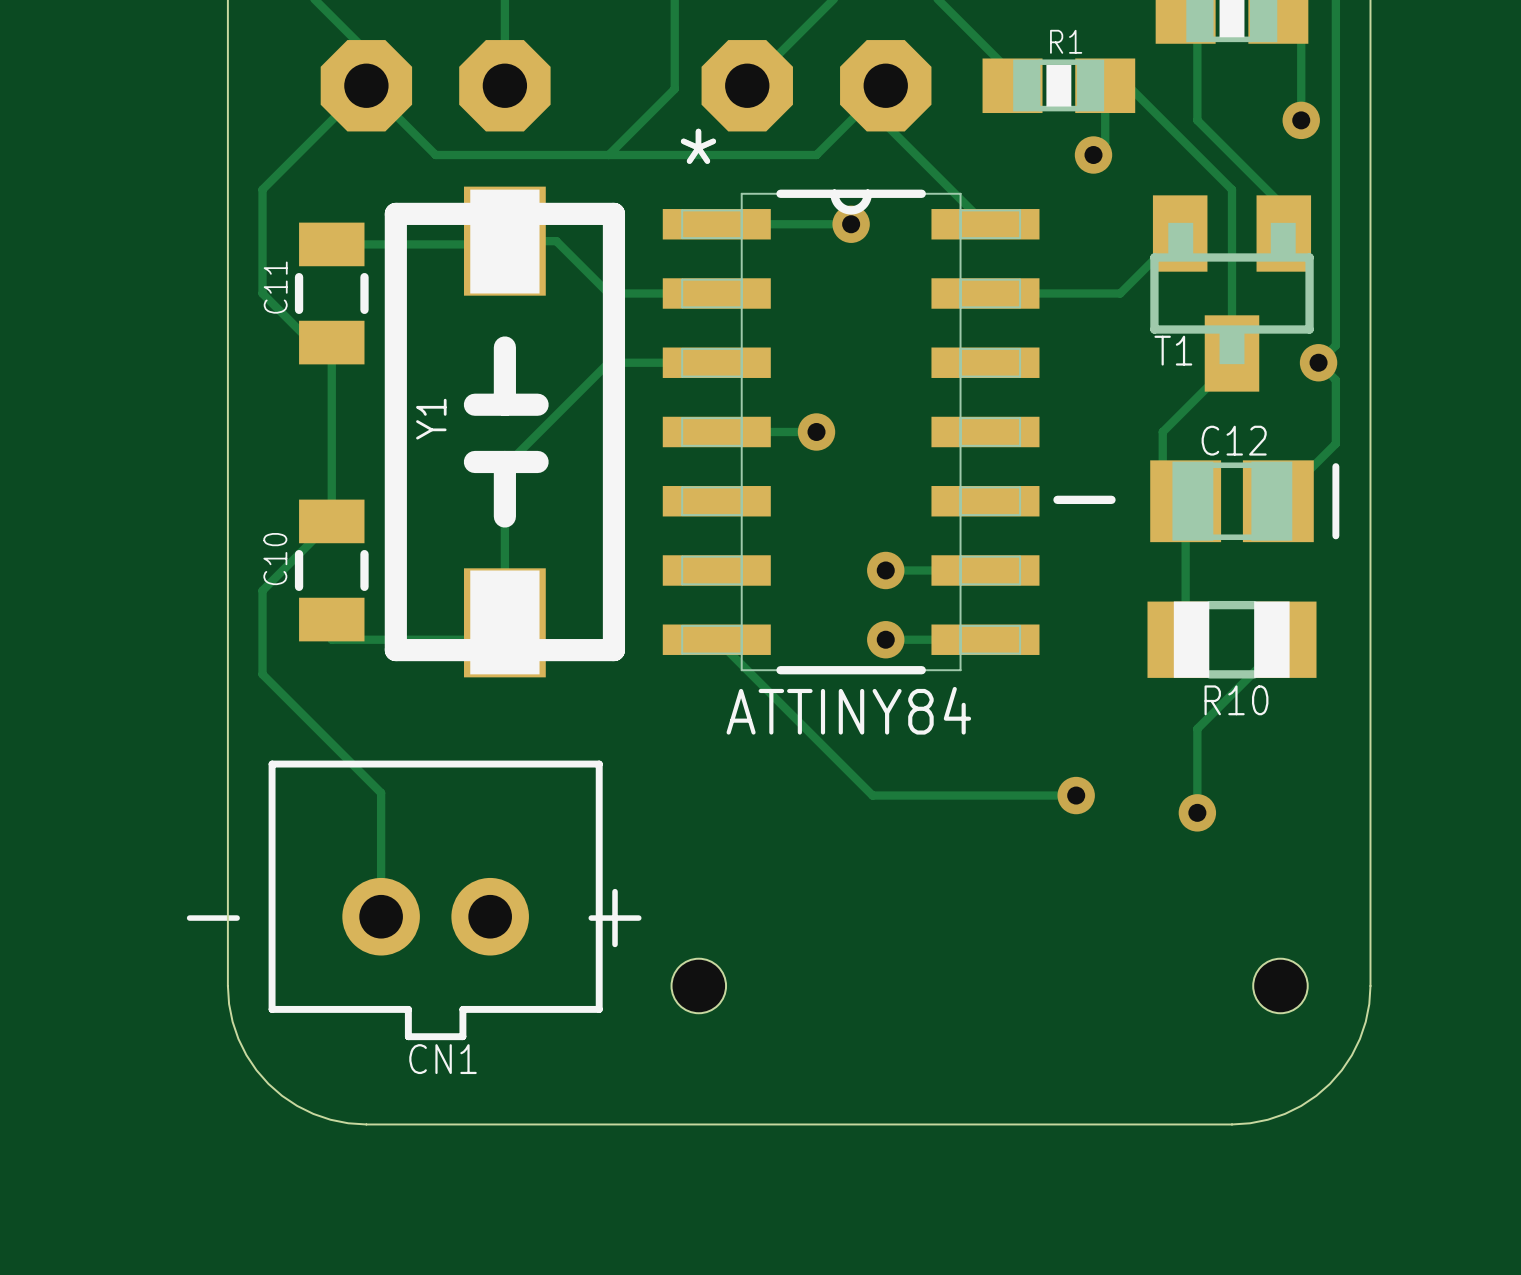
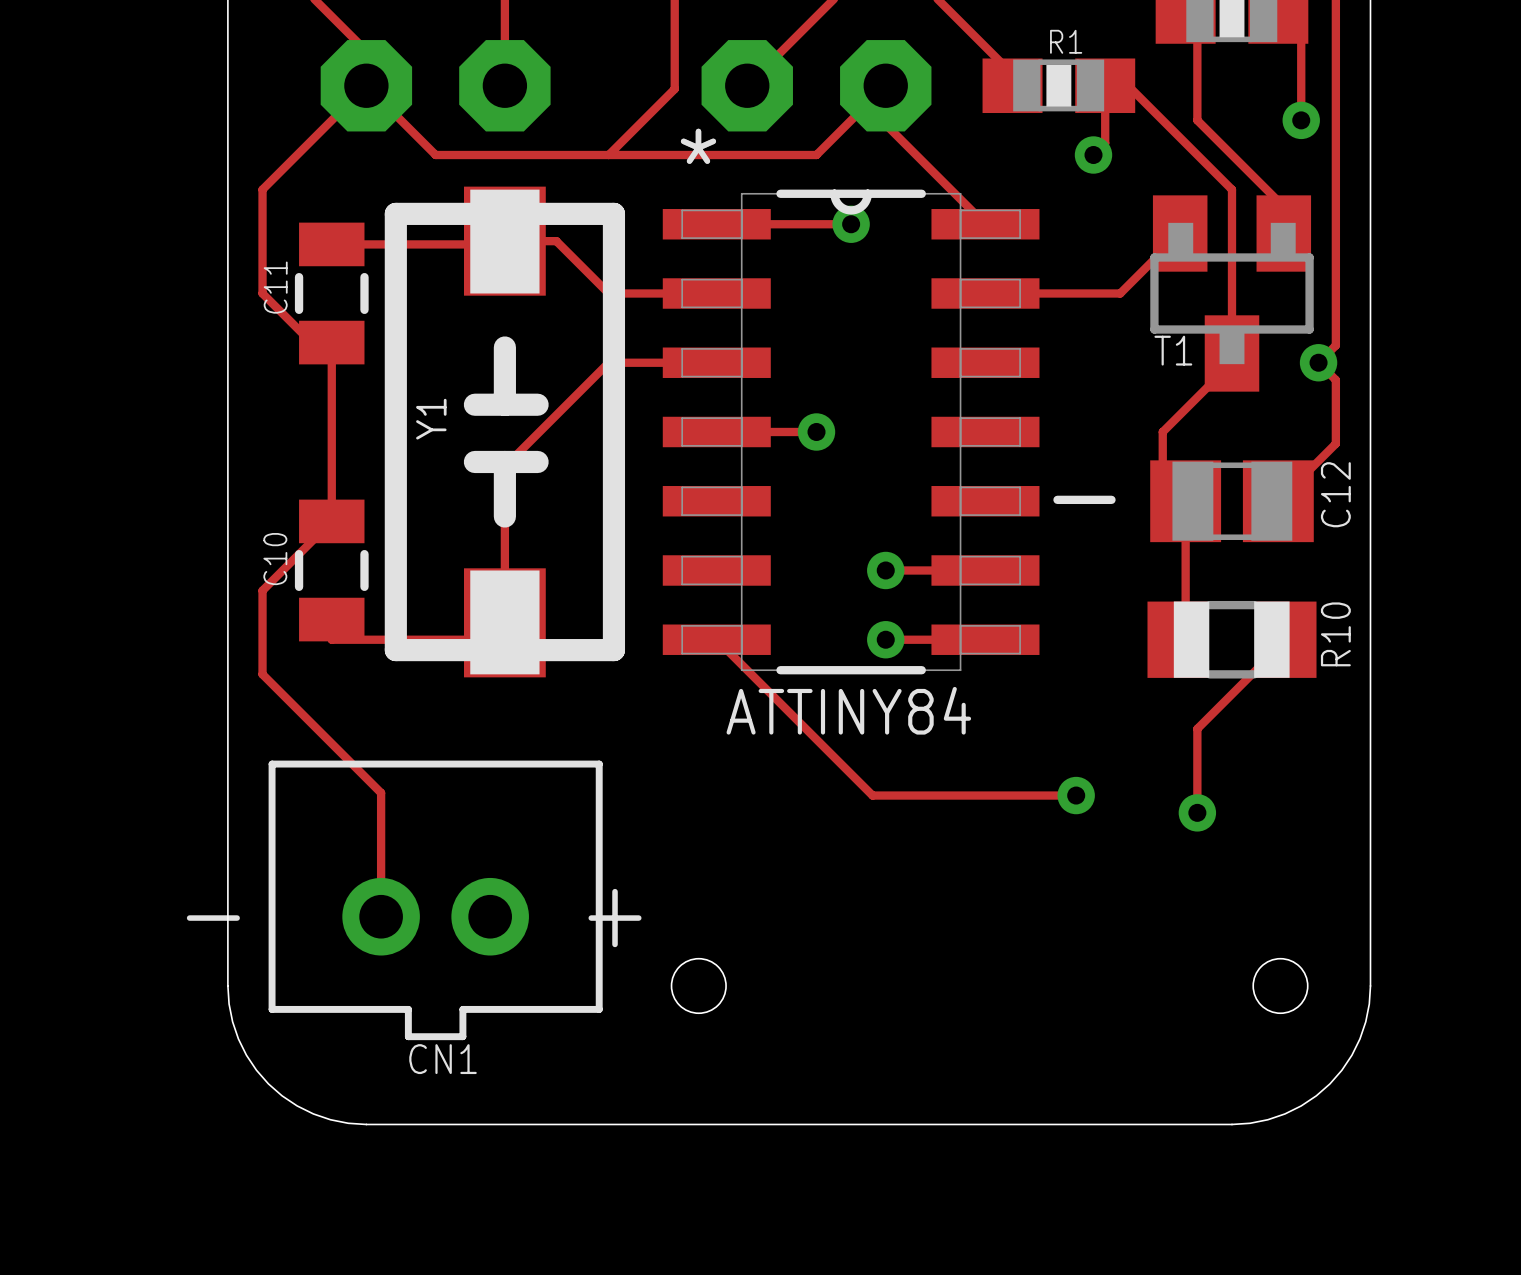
C12 name rotation: 0° (1234, 440) -> 90° counterclockwise (1335, 494)
C12 name position: C12 (1234, 440) -> C12 (1335, 494)
line: (1335, 466) (1335, 535) -> none
R10 name rotation: 0° (1236, 700) -> 90° counterclockwise (1335, 634)
R10 name position: R10 (1236, 700) -> R10 (1335, 634)

